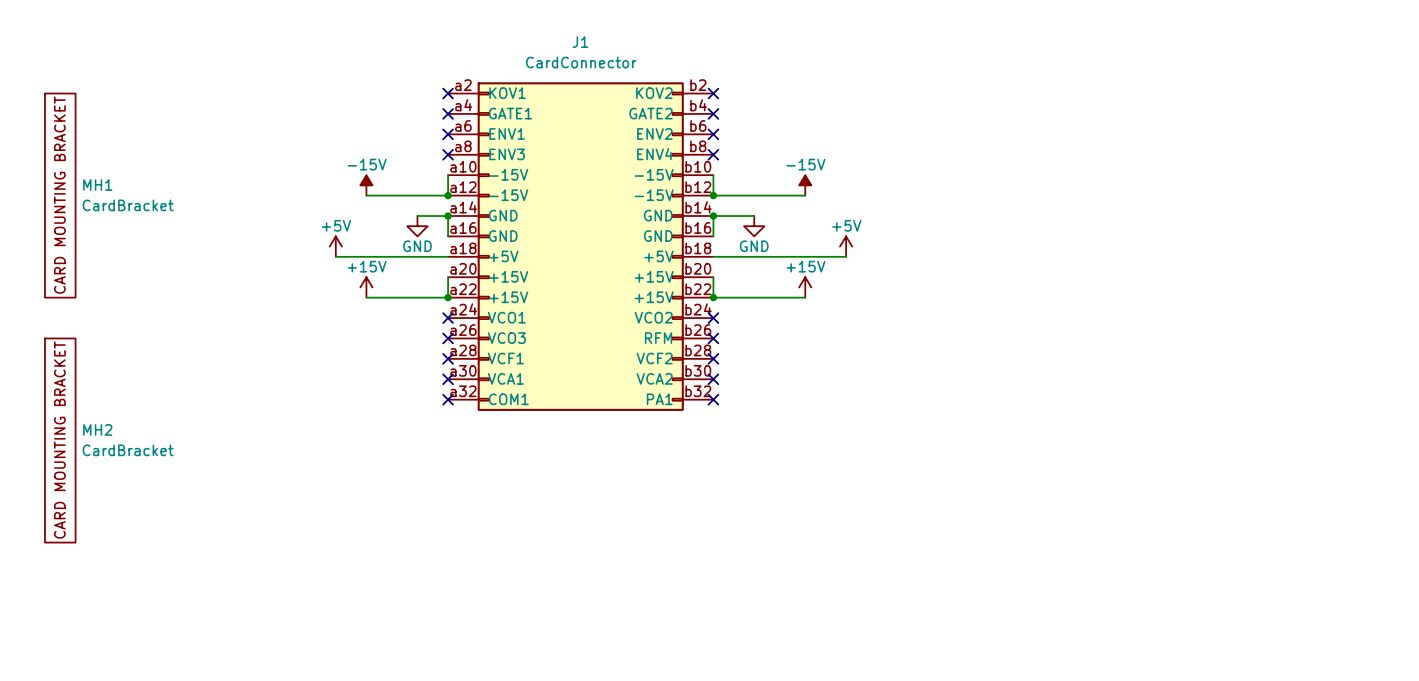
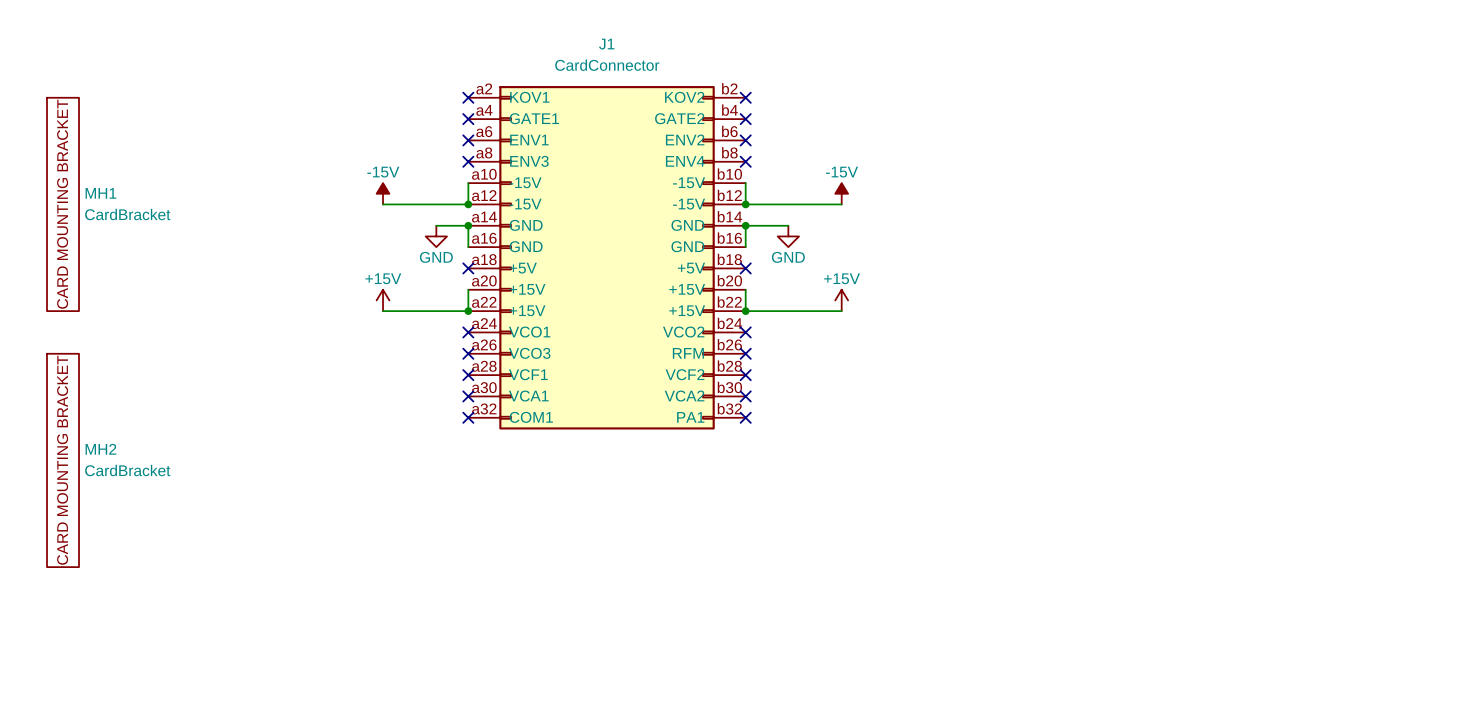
power symbol: +5V (335, 246) -> none
power symbol: +5V (846, 246) -> none
wire: (335, 256) (448, 256) -> none
no-connect mark: none -> (468, 268)
wire: (713, 256) (846, 256) -> none
no-connect mark: none -> (745, 268)

